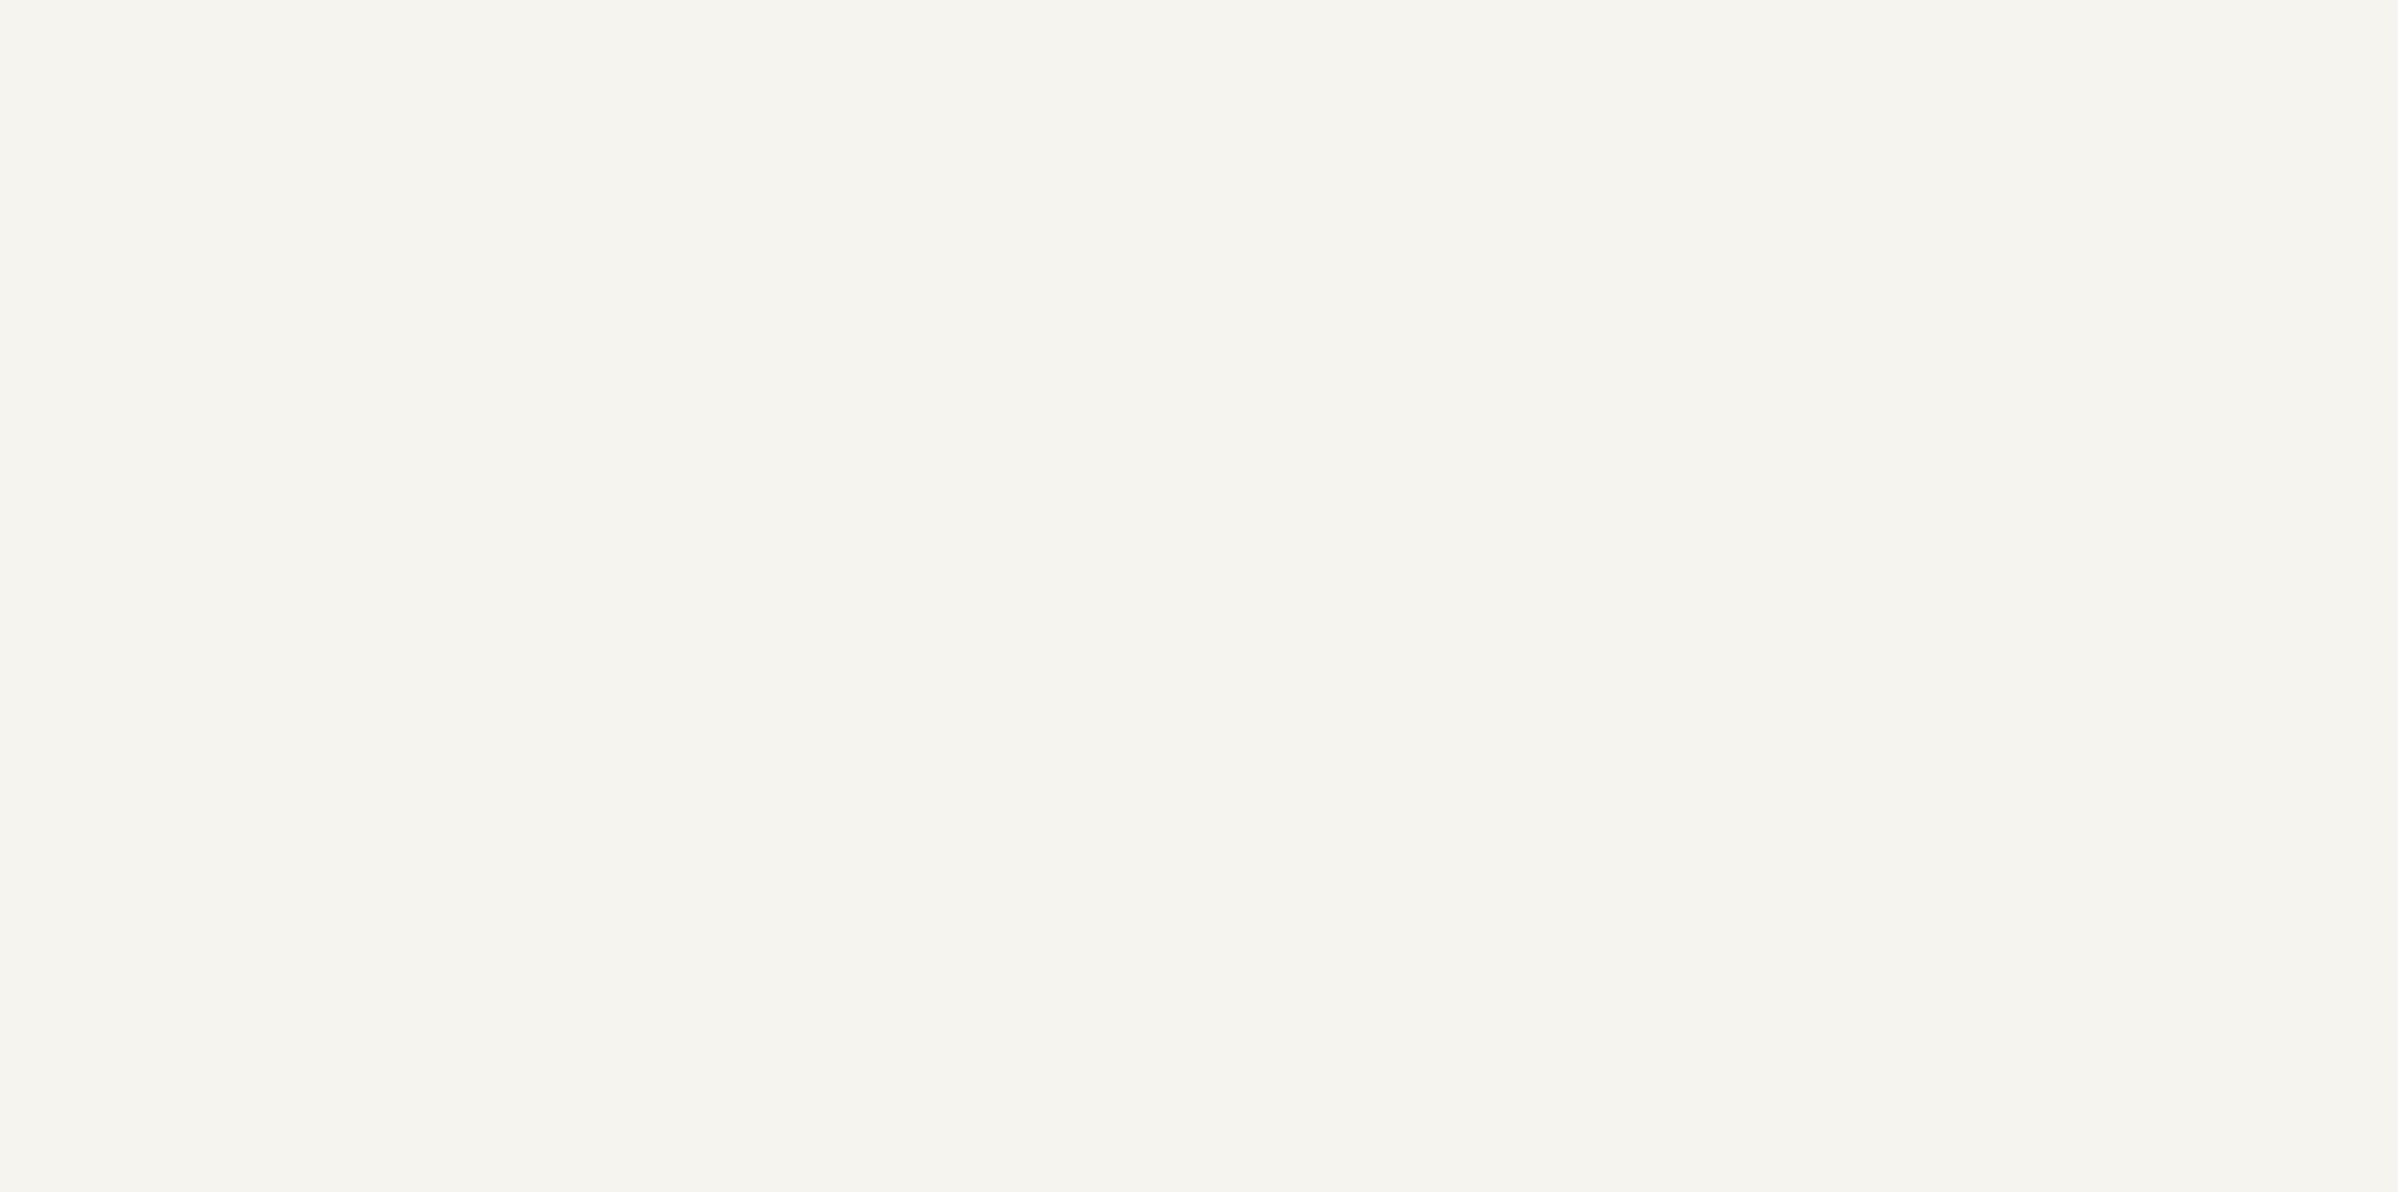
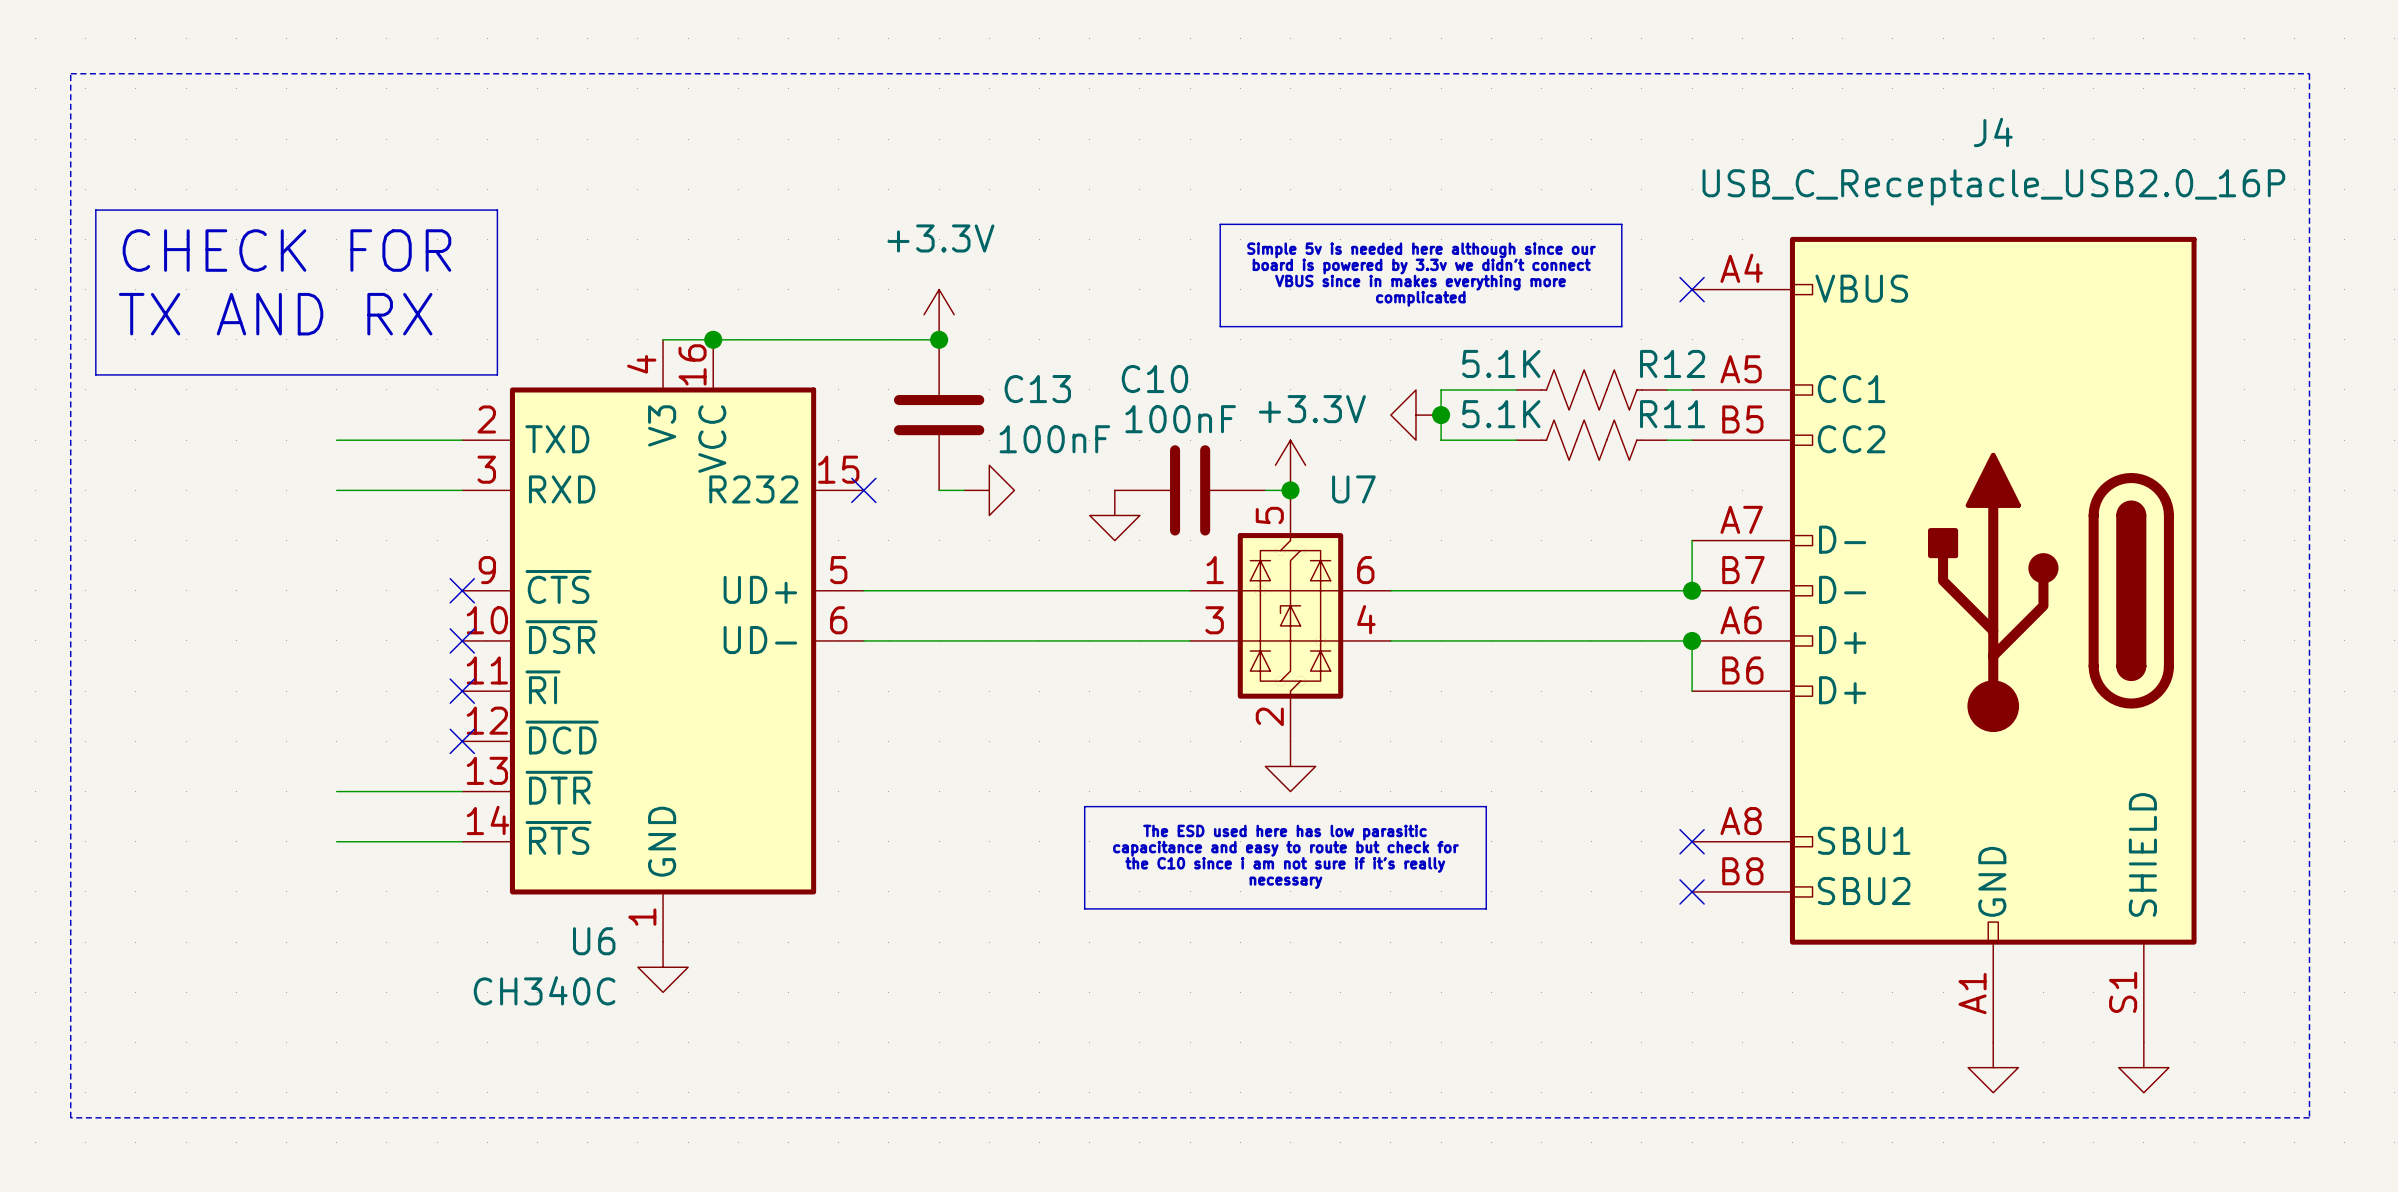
line: none -> (70, 73) (2309, 73) (2309, 1117) (70, 1117) (70, 73)
line: none -> (95, 210) (497, 210) (497, 374) (95, 374) (95, 210)
line: none -> (1220, 224) (1621, 224) (1621, 326) (1220, 326) (1220, 224)
text: none -> CHECK FOR (286, 250)
text: none -> Simple 5v is needed here although since our (1421, 250)
text: none -> board is powered by 3.3v we didn't connect (1421, 266)
text: none -> VBUS since in makes everything more (1420, 282)
no-connect mark: none -> (1692, 289)
text: none -> complicated (1420, 298)
text: none -> TX AND RX (275, 314)
power symbol: none -> +3.3V (939, 314)
wire: none -> (663, 339) (939, 339)
junction: none -> (713, 339)
junction: none -> (939, 339)
wire: none -> (1516, 389) (1441, 389) (1441, 440) (1516, 440)
R12: none -> 5.1K (1591, 389)
wire: none -> (1666, 389) (1692, 389)
C13: none -> 100nF (939, 415)
power symbol: none -> (1415, 415)
junction: none -> (1441, 415)
wire: none -> (336, 440) (462, 440)
R11: none -> 5.1K (1591, 440)
wire: none -> (1666, 440) (1692, 440)
power symbol: none -> +3.3V (1290, 465)
wire: none -> (336, 490) (462, 490)
no-connect mark: none -> (863, 490)
wire: none -> (939, 490) (964, 490)
power symbol: none -> (989, 490)
C10: none -> 100nF (1190, 490)
wire: none -> (1265, 490) (1290, 490)
junction: none -> (1290, 490)
power symbol: none -> (1114, 515)
wire: none -> (1692, 540) (1692, 590) (1390, 590)
no-connect mark: none -> (462, 590)
wire: none -> (863, 590) (1190, 590)
junction: none -> (1692, 590)
U7: none -> (1290, 615)
J4: none -> USB_C_Receptacle_USB2.0_16P (1944, 639)
no-connect mark: none -> (462, 640)
U6: none -> CH340C (663, 640)
wire: none -> (863, 640) (1190, 640)
wire: none -> (1390, 640) (1692, 640) (1692, 691)
junction: none -> (1692, 640)
no-connect mark: none -> (462, 691)
no-connect mark: none -> (462, 741)
power symbol: none -> (1290, 766)
wire: none -> (336, 791) (462, 791)
line: none -> (1084, 806) (1486, 806) (1486, 908) (1084, 908) (1084, 806)
text: none -> The ESD used here has low parasitic (1285, 832)
wire: none -> (336, 841) (462, 841)
no-connect mark: none -> (1692, 841)
text: none -> capacitance and easy to route but check for (1285, 848)
text: none -> the C10 since i am not sure if it's really (1285, 864)
text: none -> necessary (1285, 882)
no-connect mark: none -> (1692, 891)
power symbol: none -> (663, 967)
power symbol: none -> (1993, 1067)
power symbol: none -> (2143, 1067)

